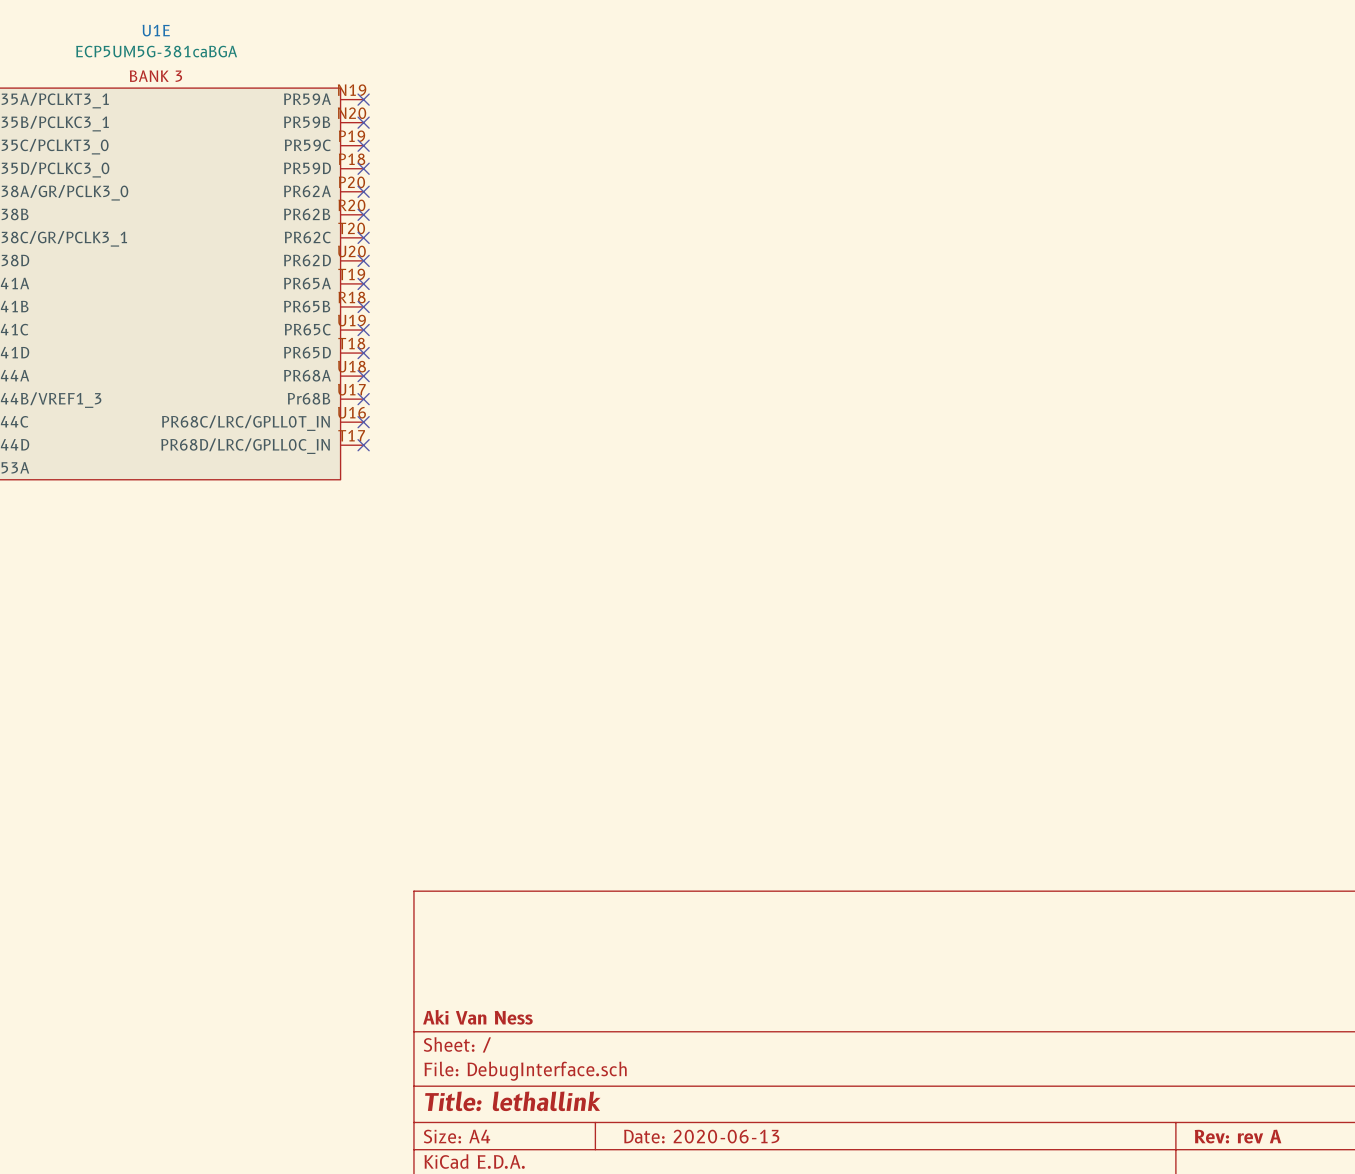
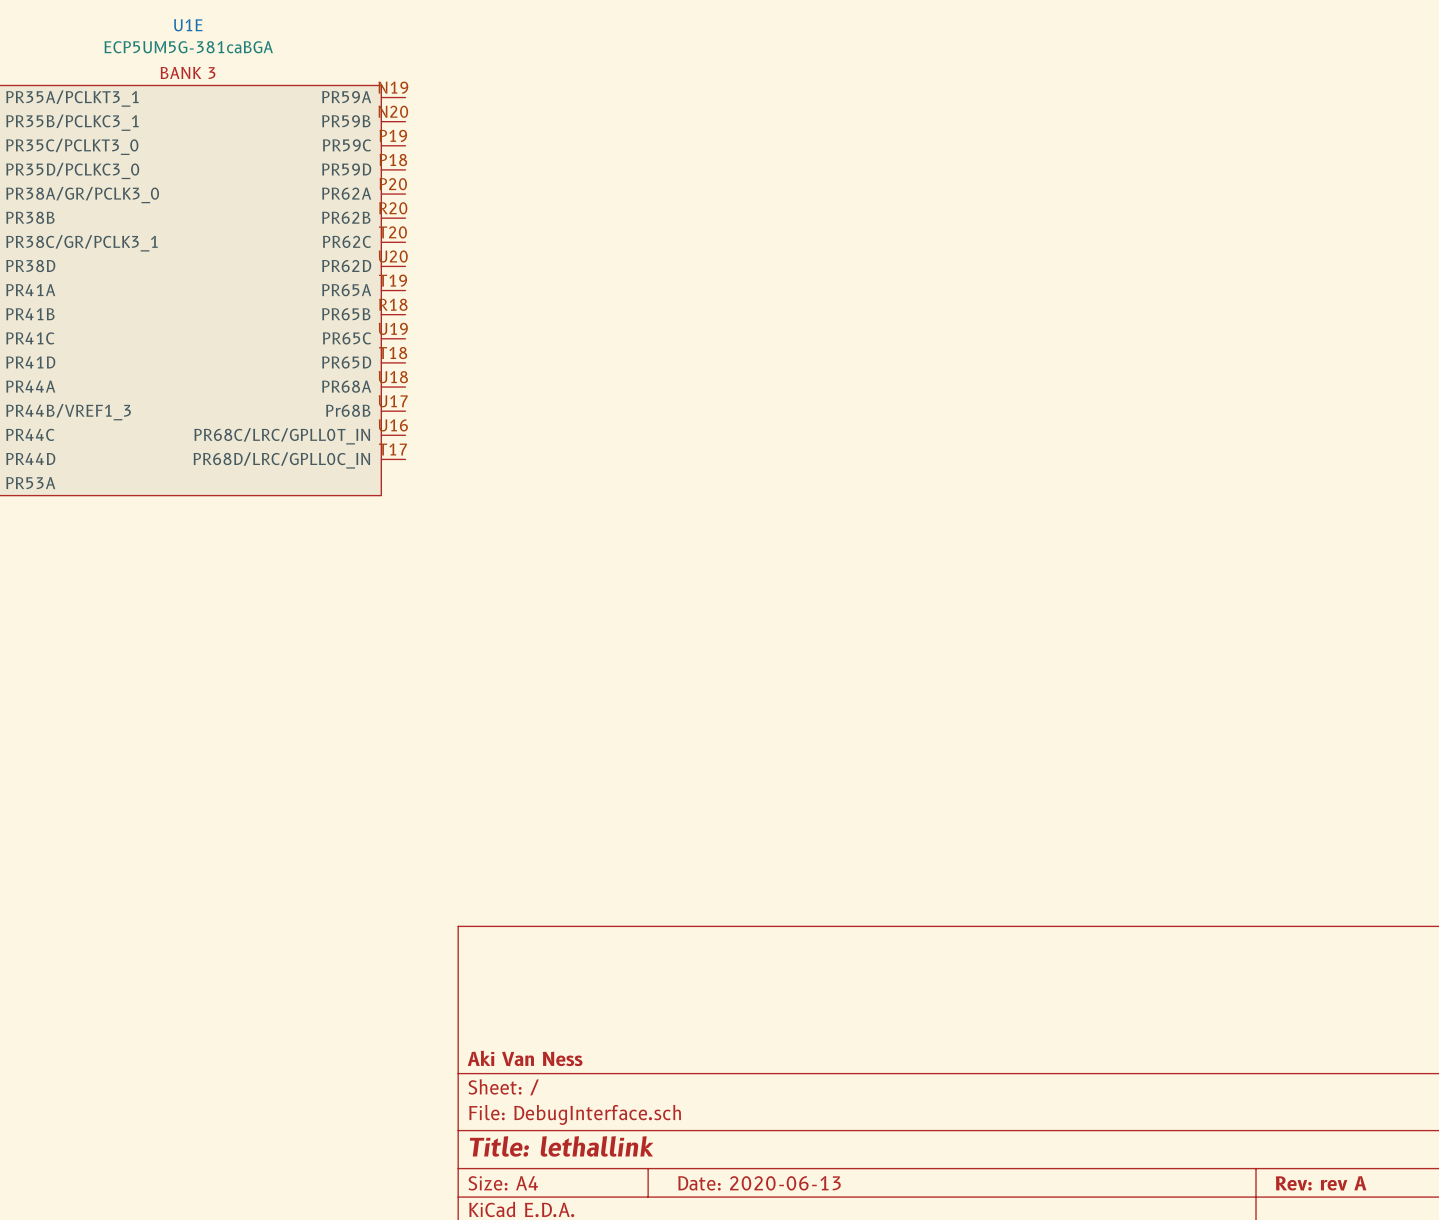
no-connect mark: (363, 99) -> none
no-connect mark: (363, 122) -> none
no-connect mark: (363, 145) -> none
no-connect mark: (363, 168) -> none
no-connect mark: (363, 191) -> none
no-connect mark: (363, 214) -> none
no-connect mark: (363, 237) -> none
no-connect mark: (363, 260) -> none
no-connect mark: (363, 283) -> none
no-connect mark: (363, 306) -> none
no-connect mark: (363, 330) -> none
no-connect mark: (363, 353) -> none
no-connect mark: (363, 376) -> none
no-connect mark: (363, 399) -> none
no-connect mark: (363, 422) -> none
no-connect mark: (363, 445) -> none

